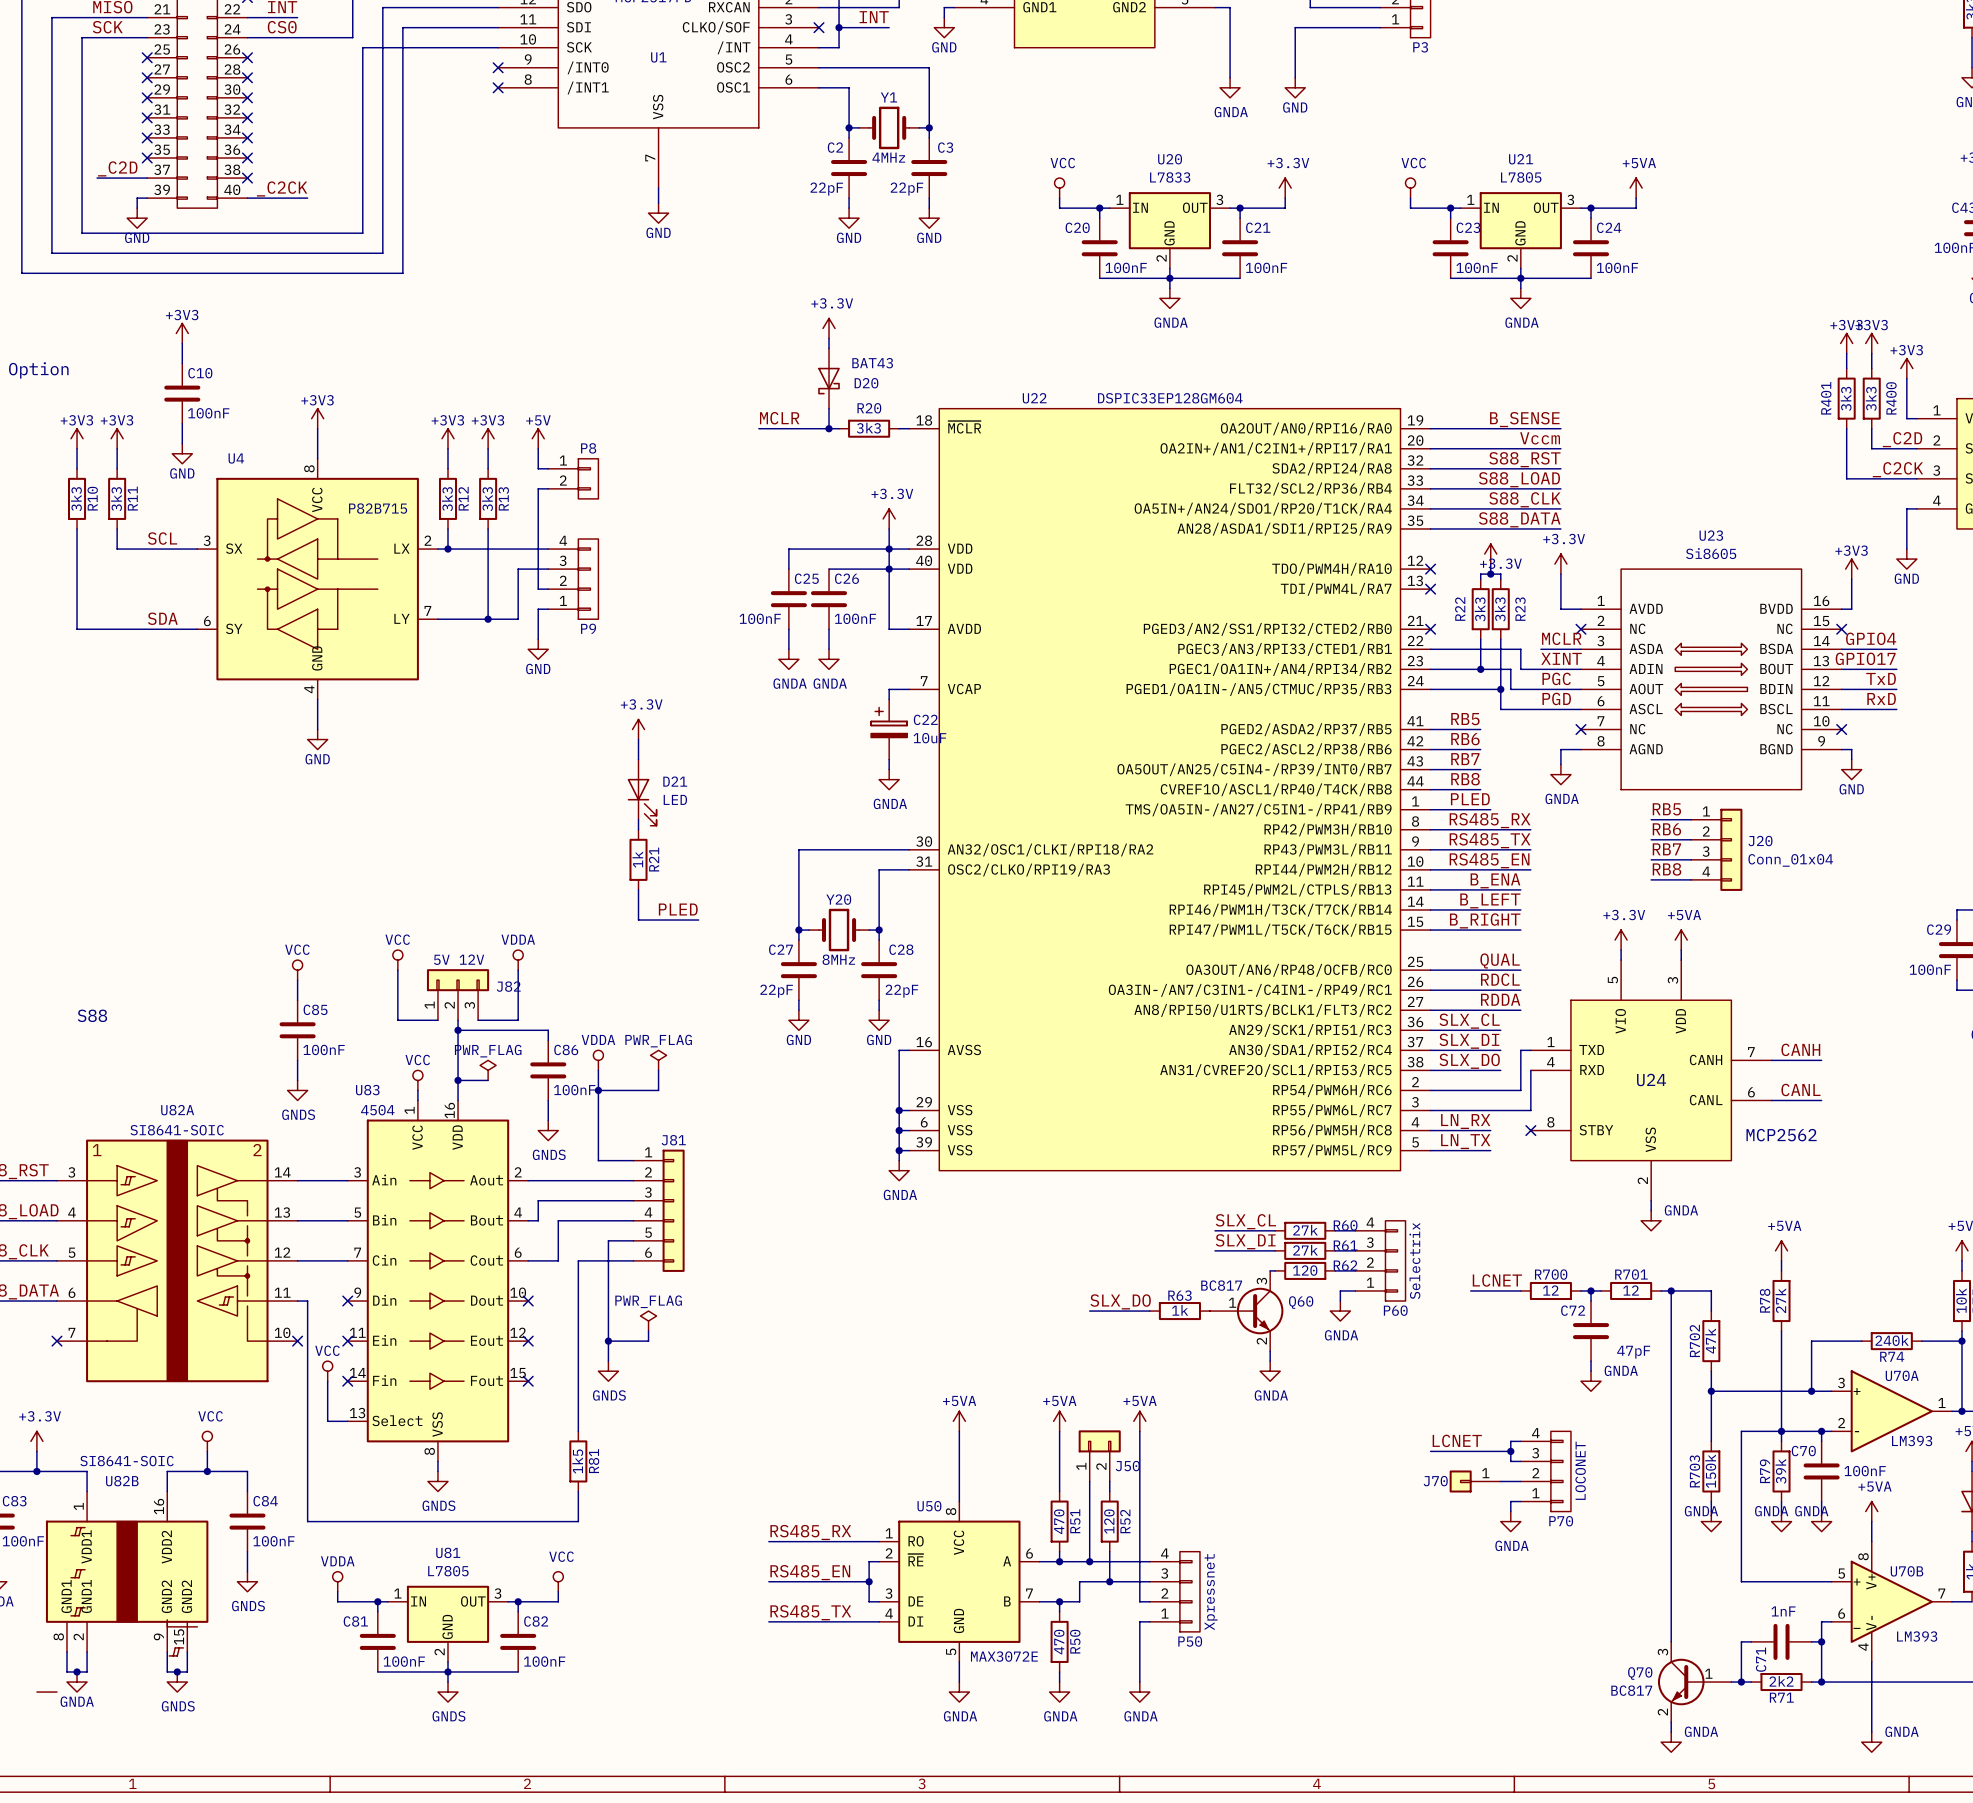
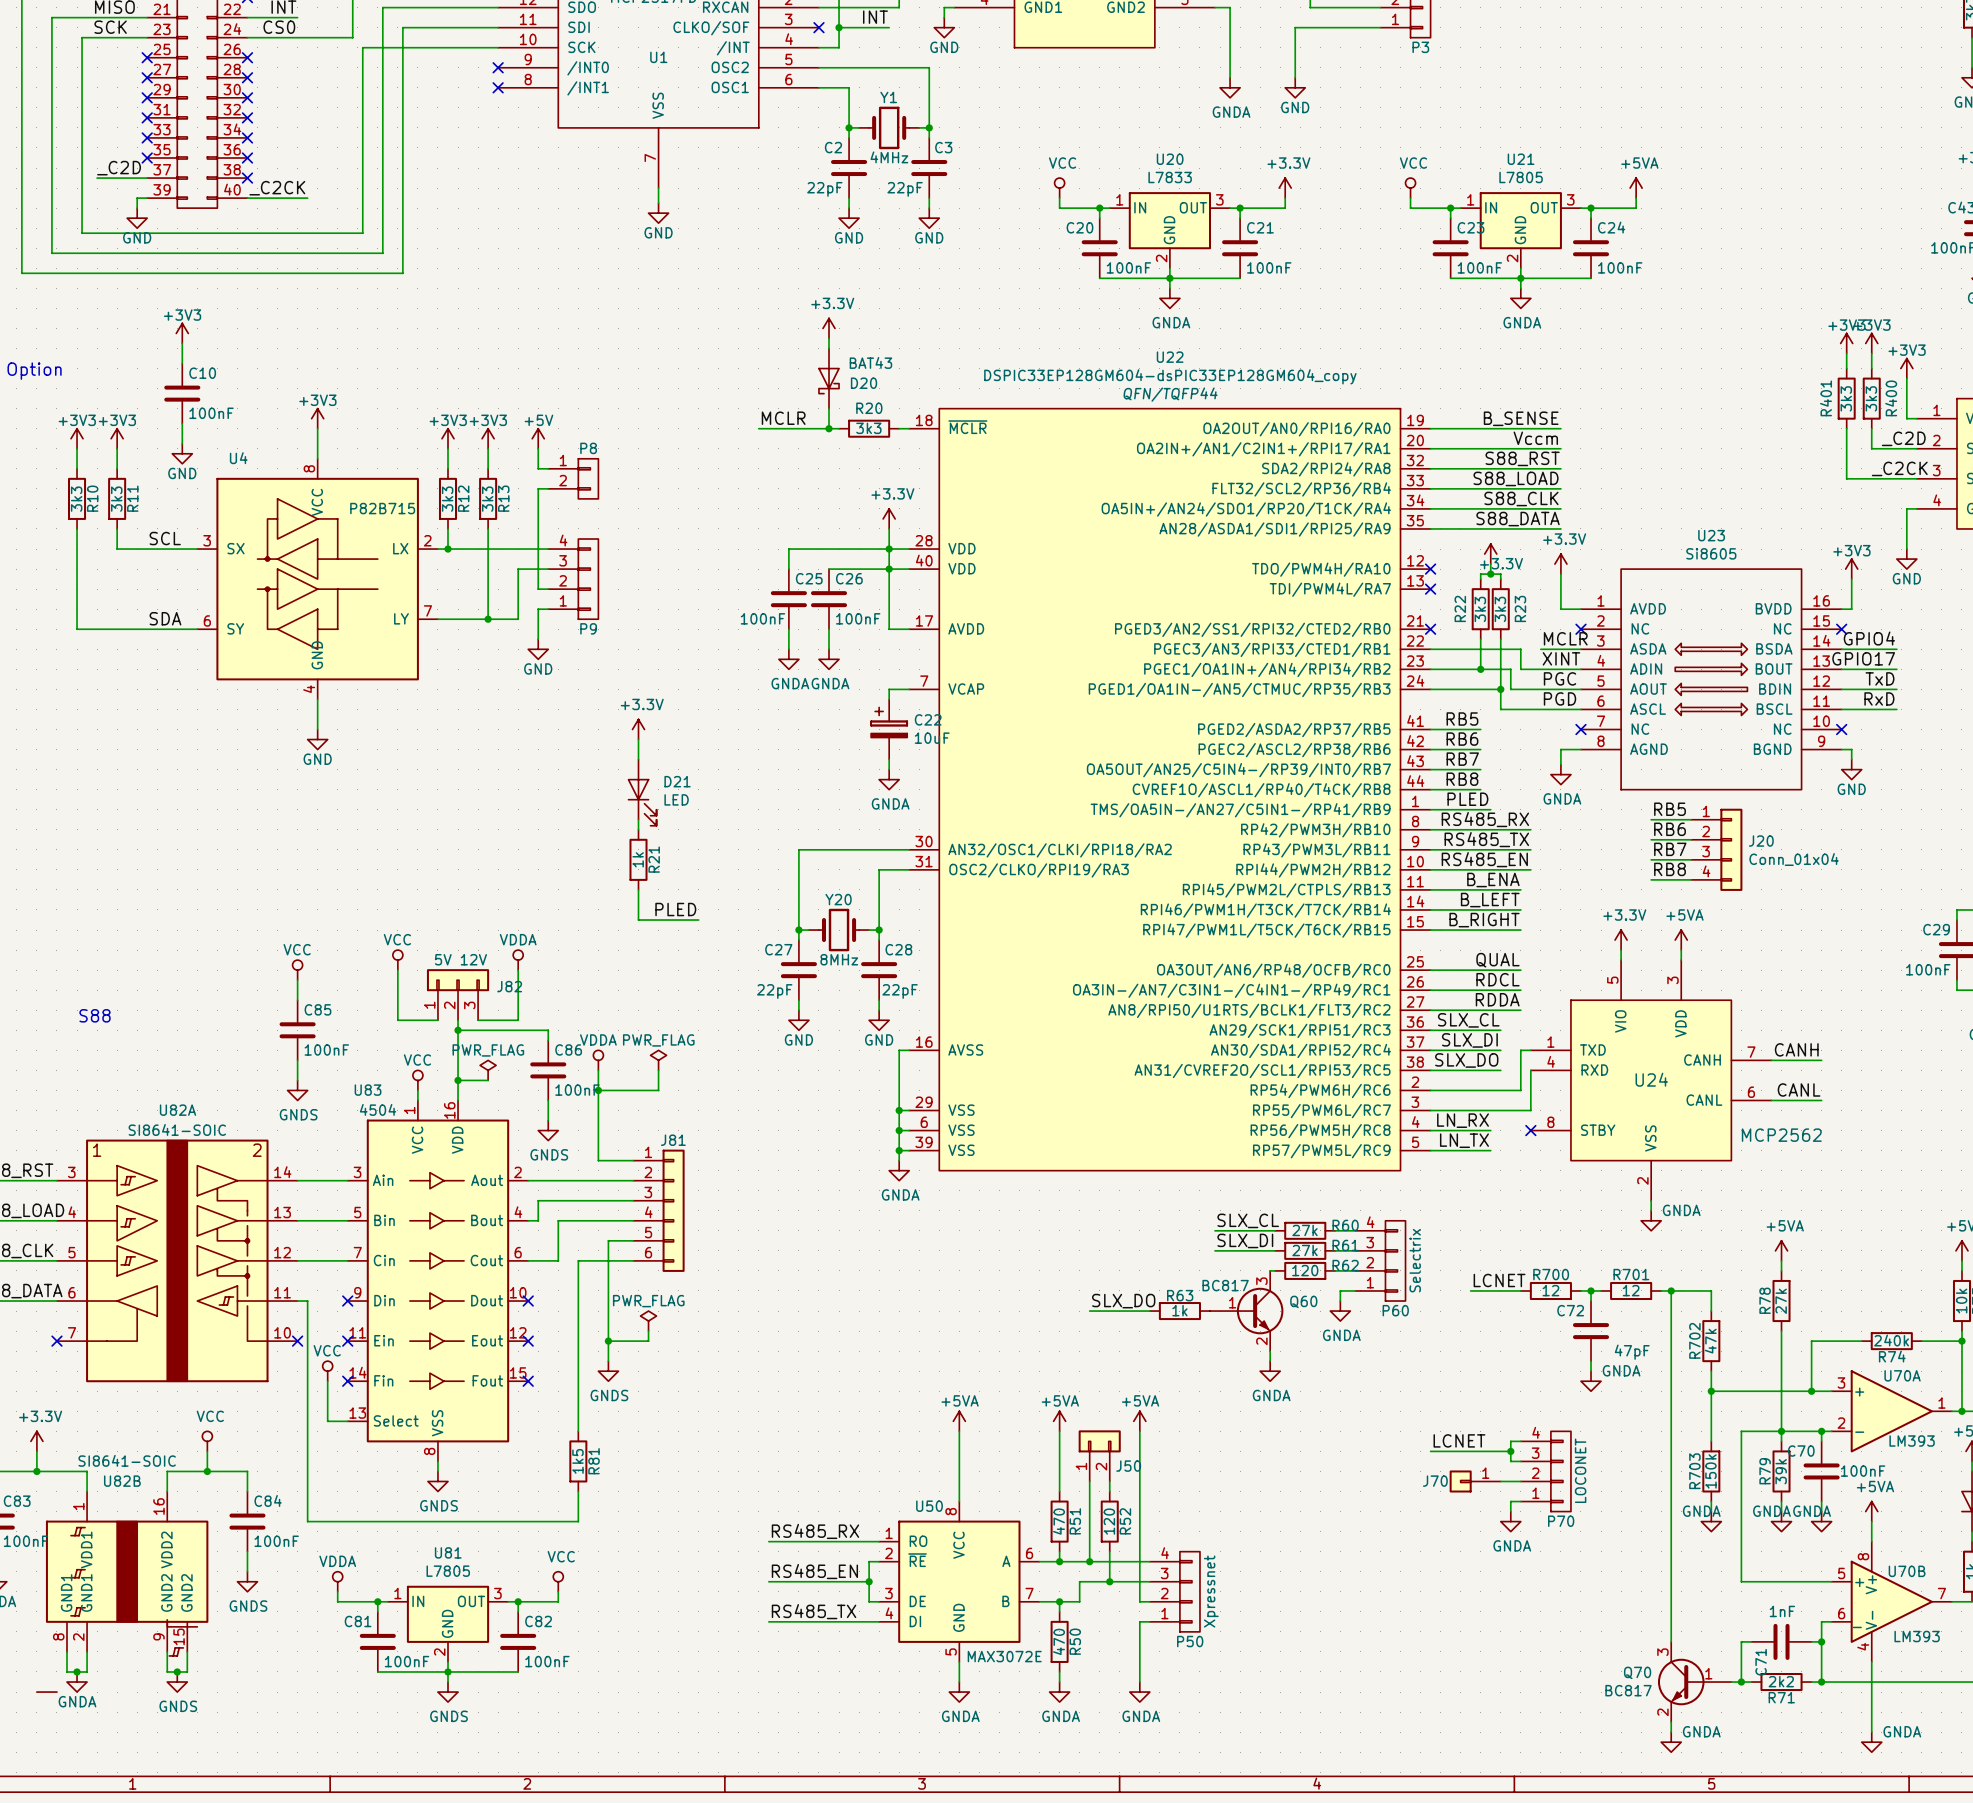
U22 text: none -> QFN/TQFP44 (1170, 394)
U22 name position: U22 (1034, 398) -> U22 (1170, 357)
U22 value: DSPIC33EP128GM604 (1170, 398) -> DSPIC33EP128GM604-dsPIC33EP128GM604_copy (1170, 376)

